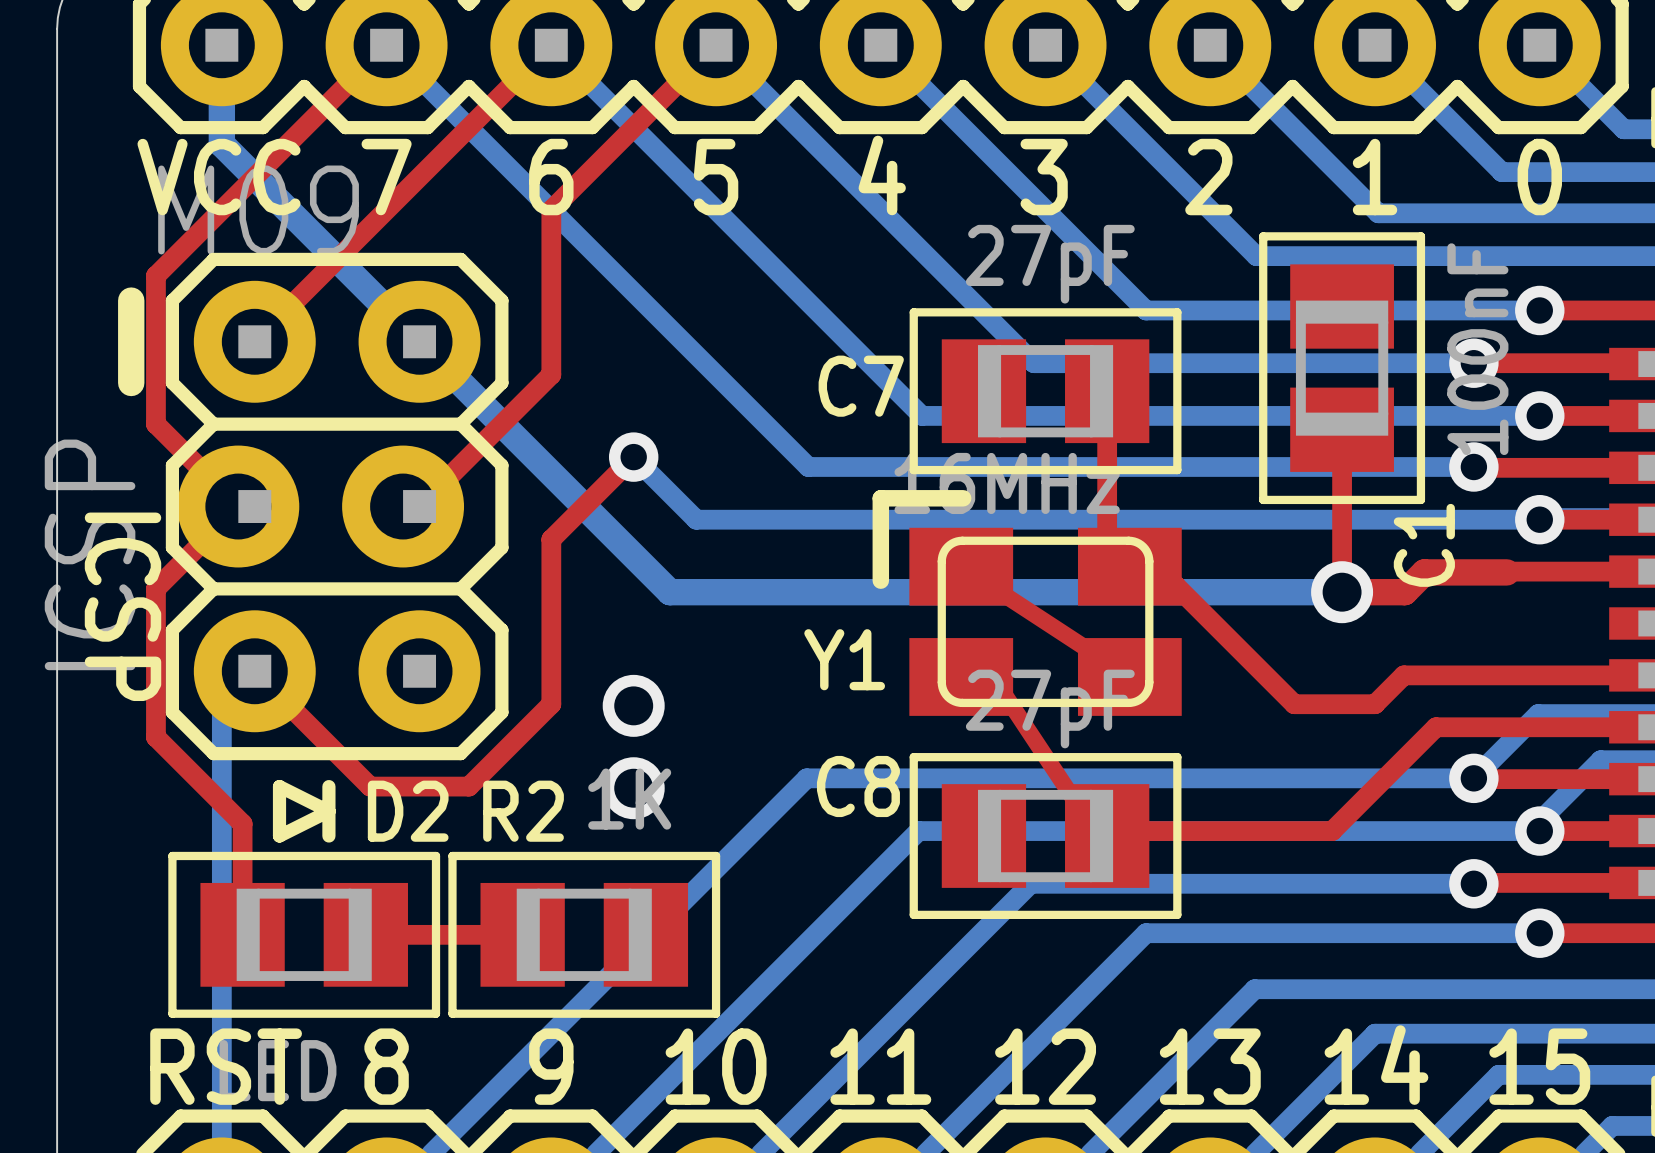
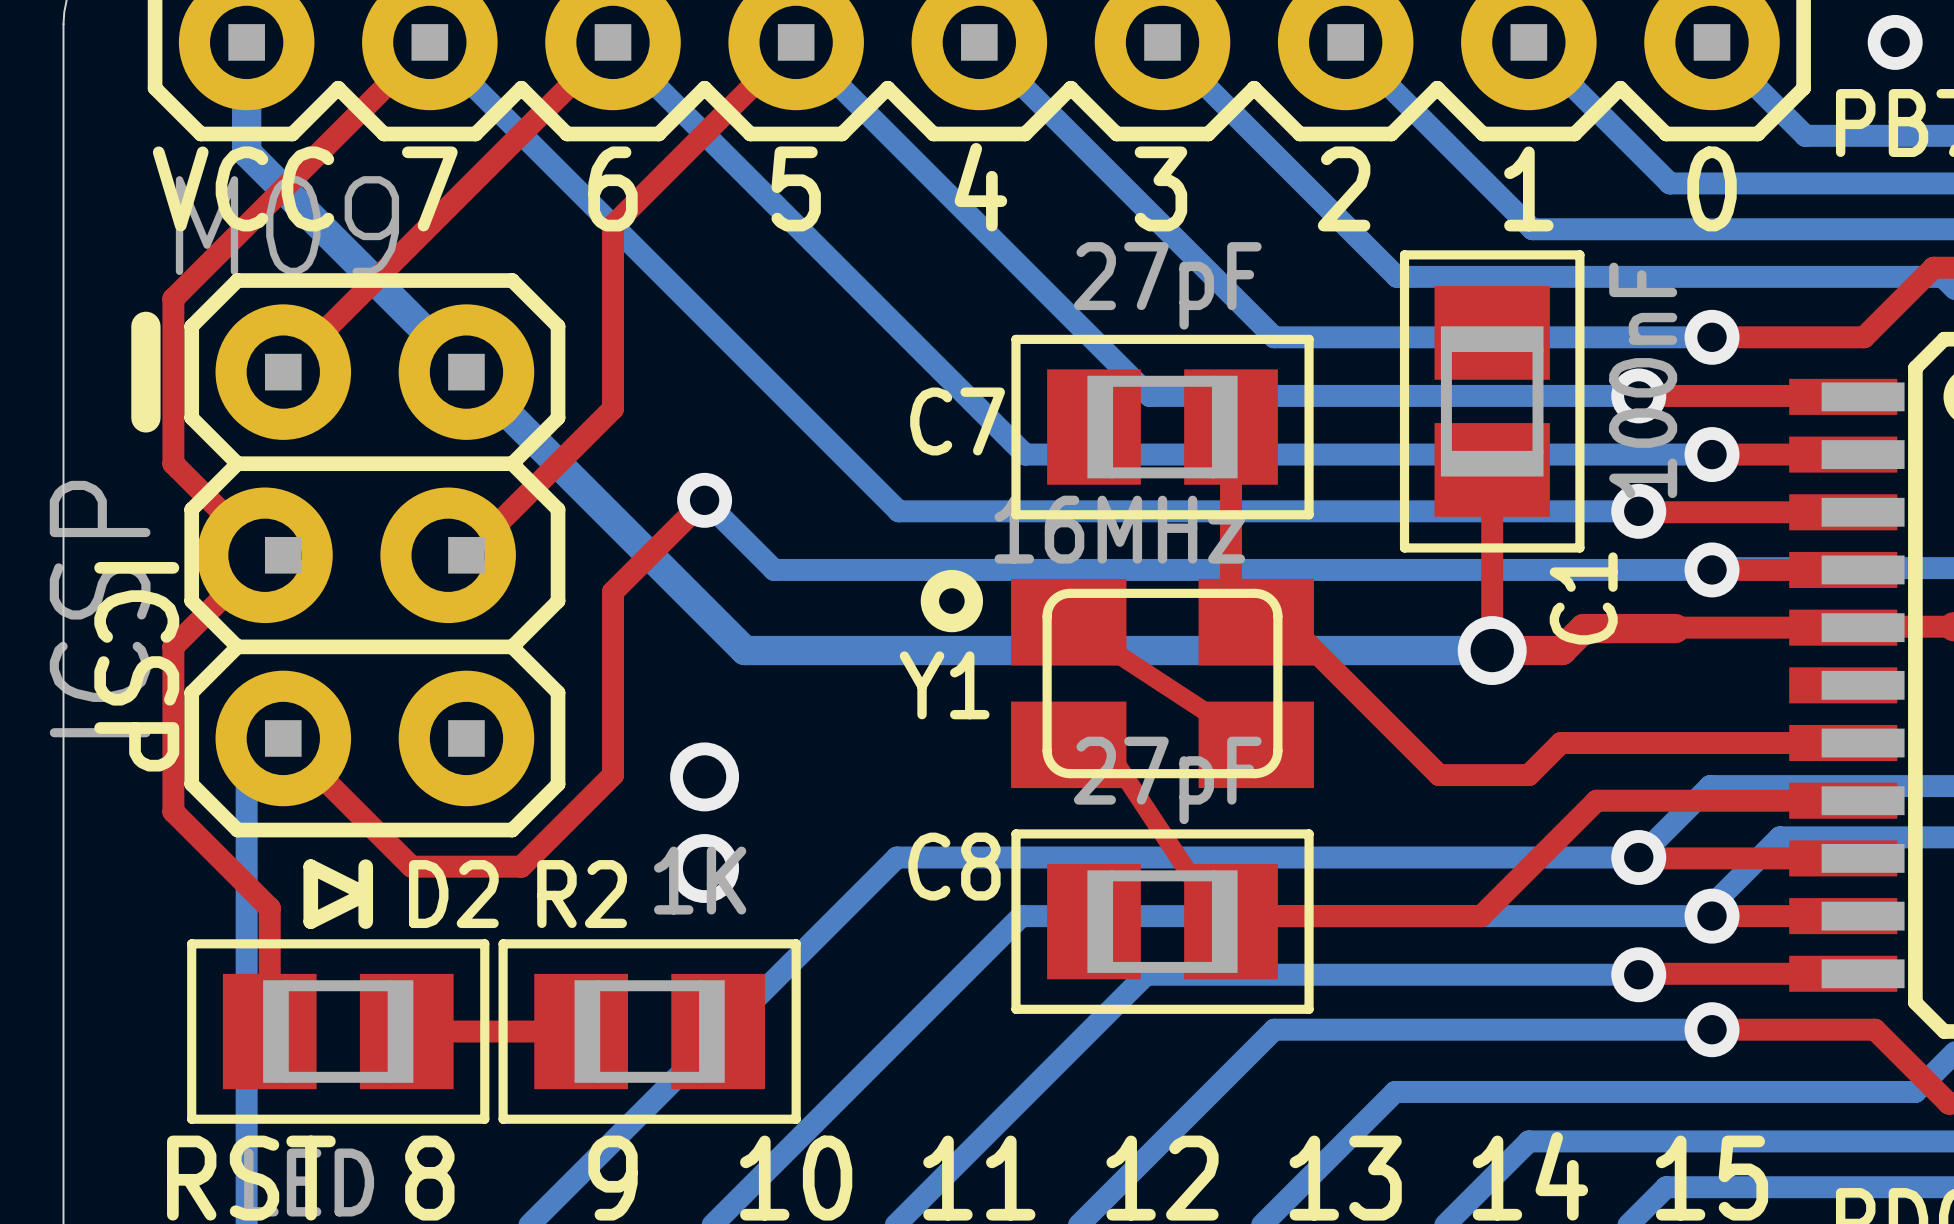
Y1 footprint: [872, 490, 1182, 716] -> [920, 569, 1314, 789]
Y1 name position: Y1 (844, 659) -> Y1 (944, 685)

